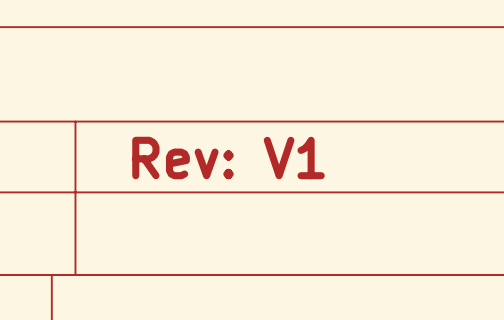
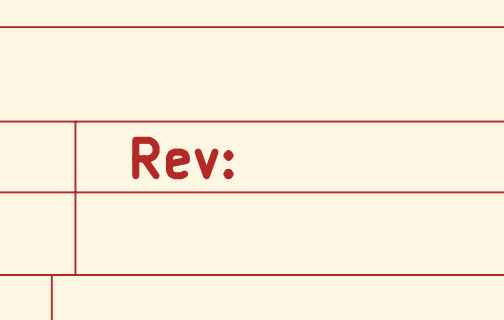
title block: Rev: V1 (228, 158) -> Rev: (182, 158)

